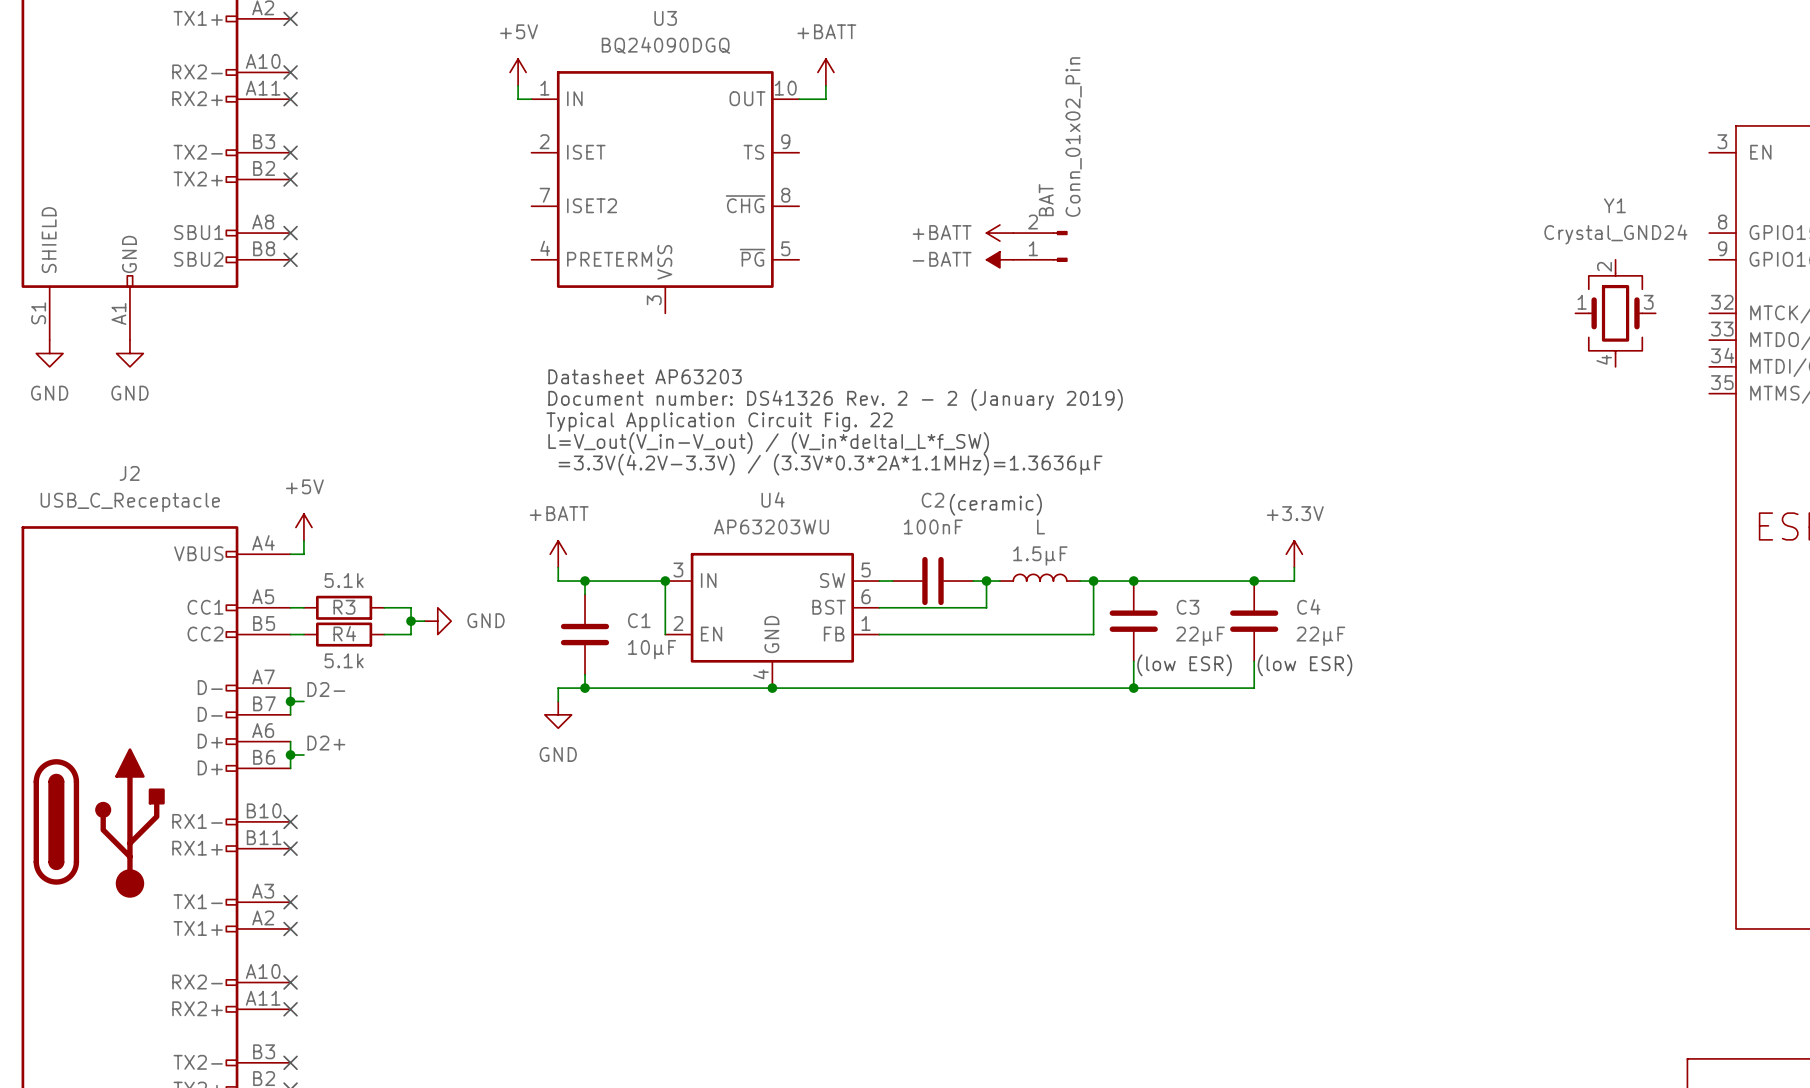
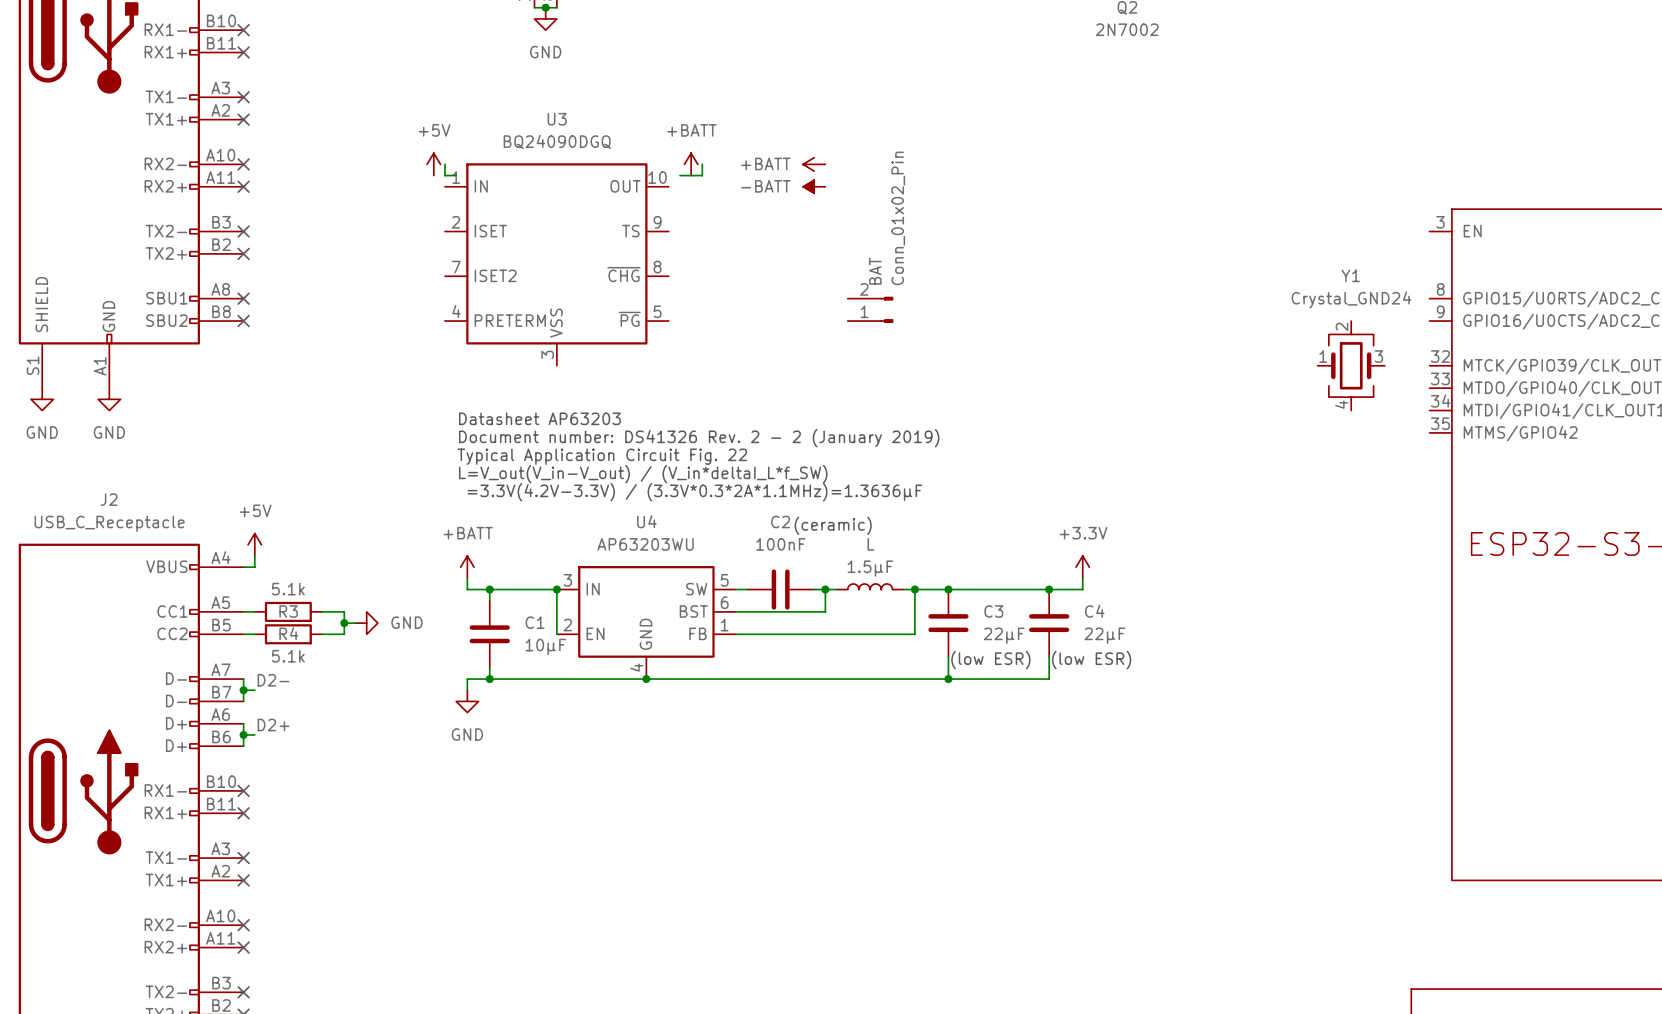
wire: (518, 85) (518, 99) (531, 99) -> (444, 164) (444, 175) (456, 175)
wire: (825, 85) (825, 99) (799, 99) -> (702, 164) (702, 175) (679, 175)
power symbol position: +BATT (999, 233) -> +BATT (814, 164)
power symbol position: -BATT (999, 259) -> -BATT (814, 186)

